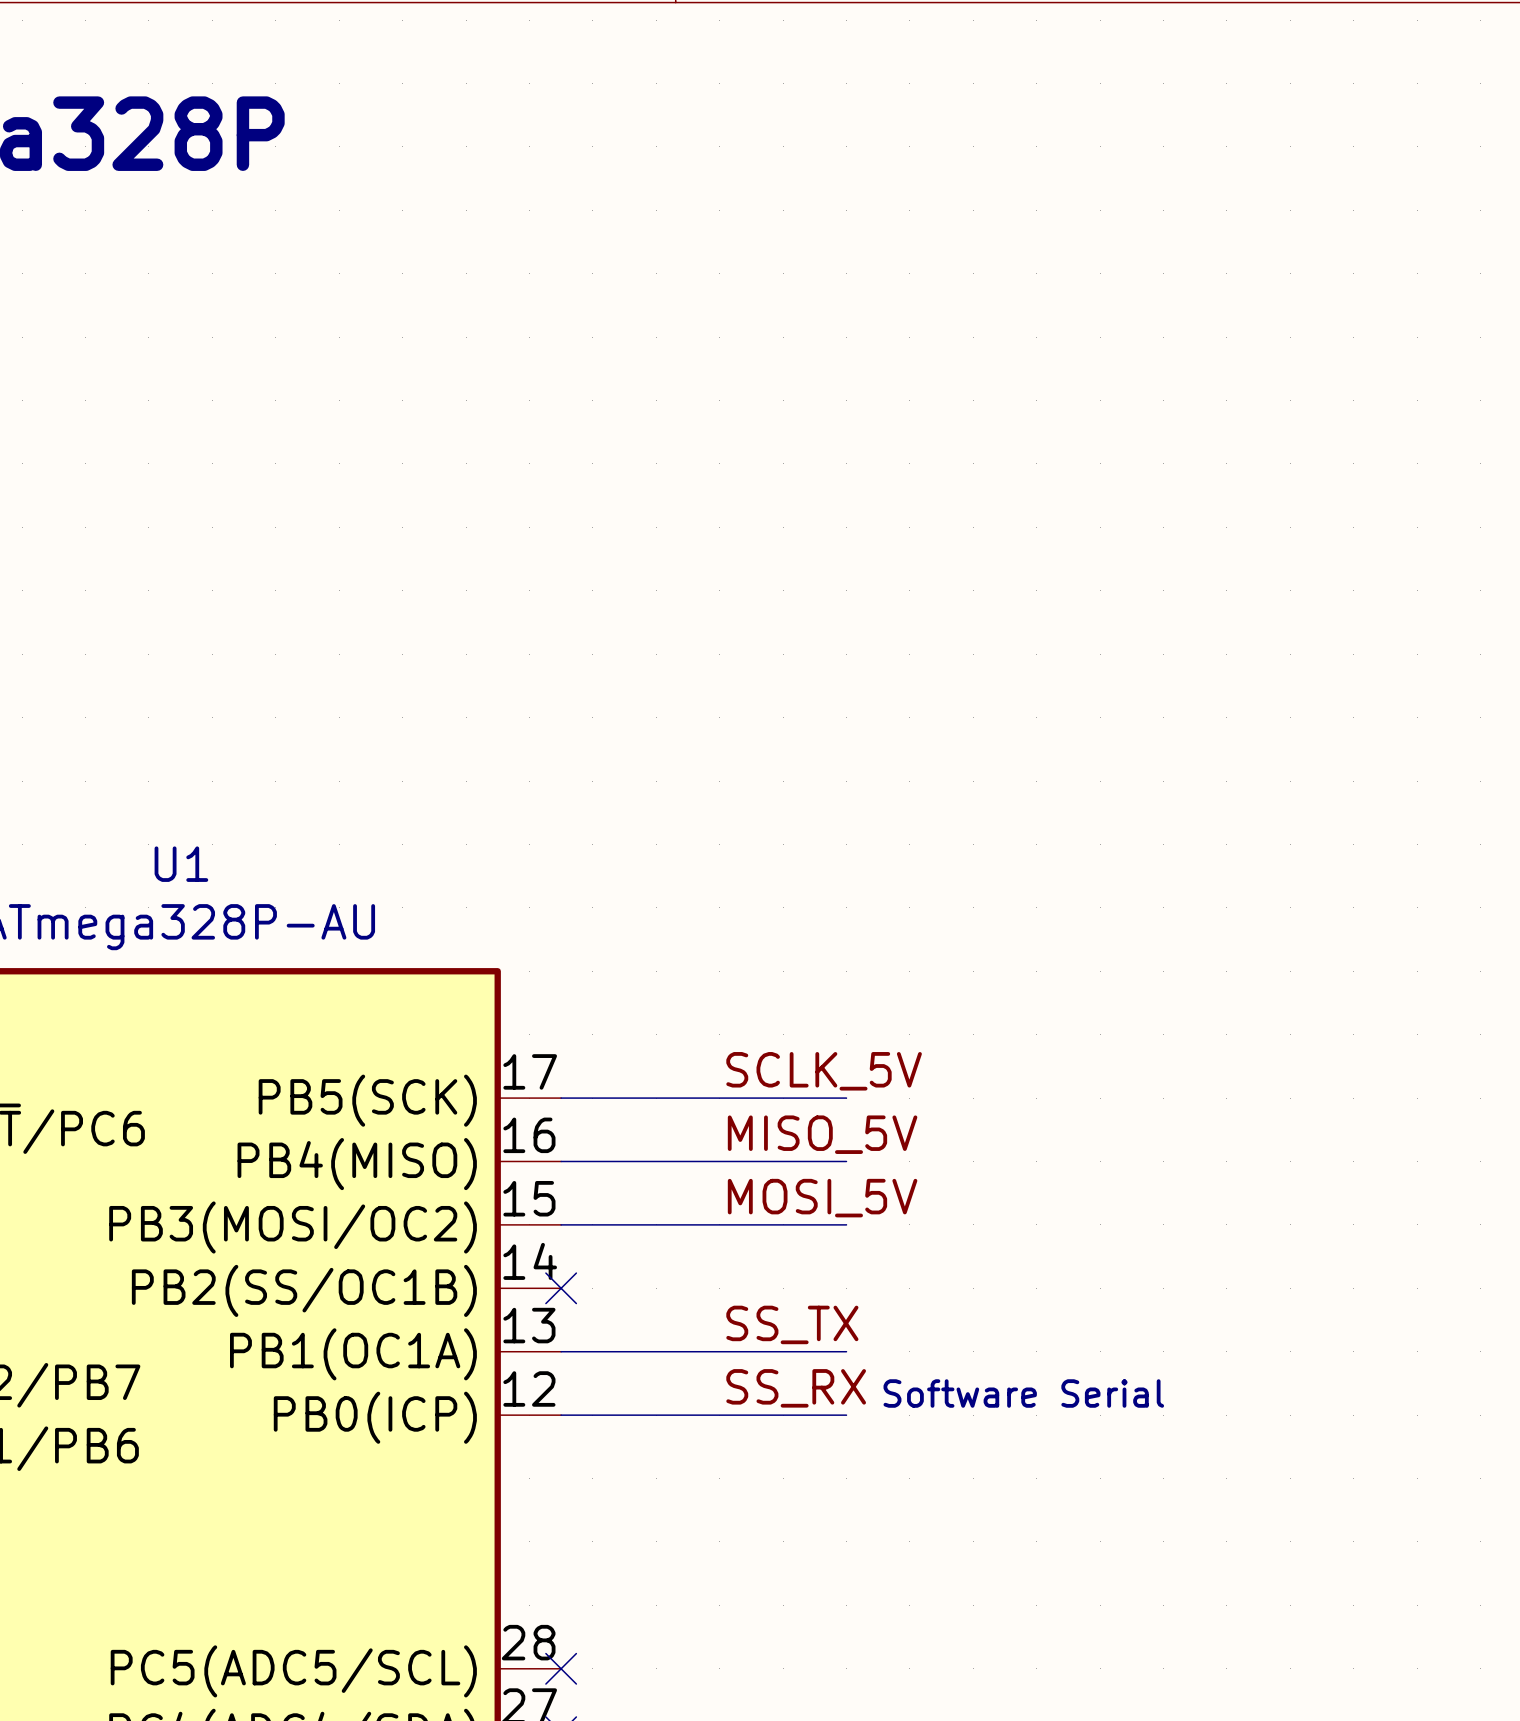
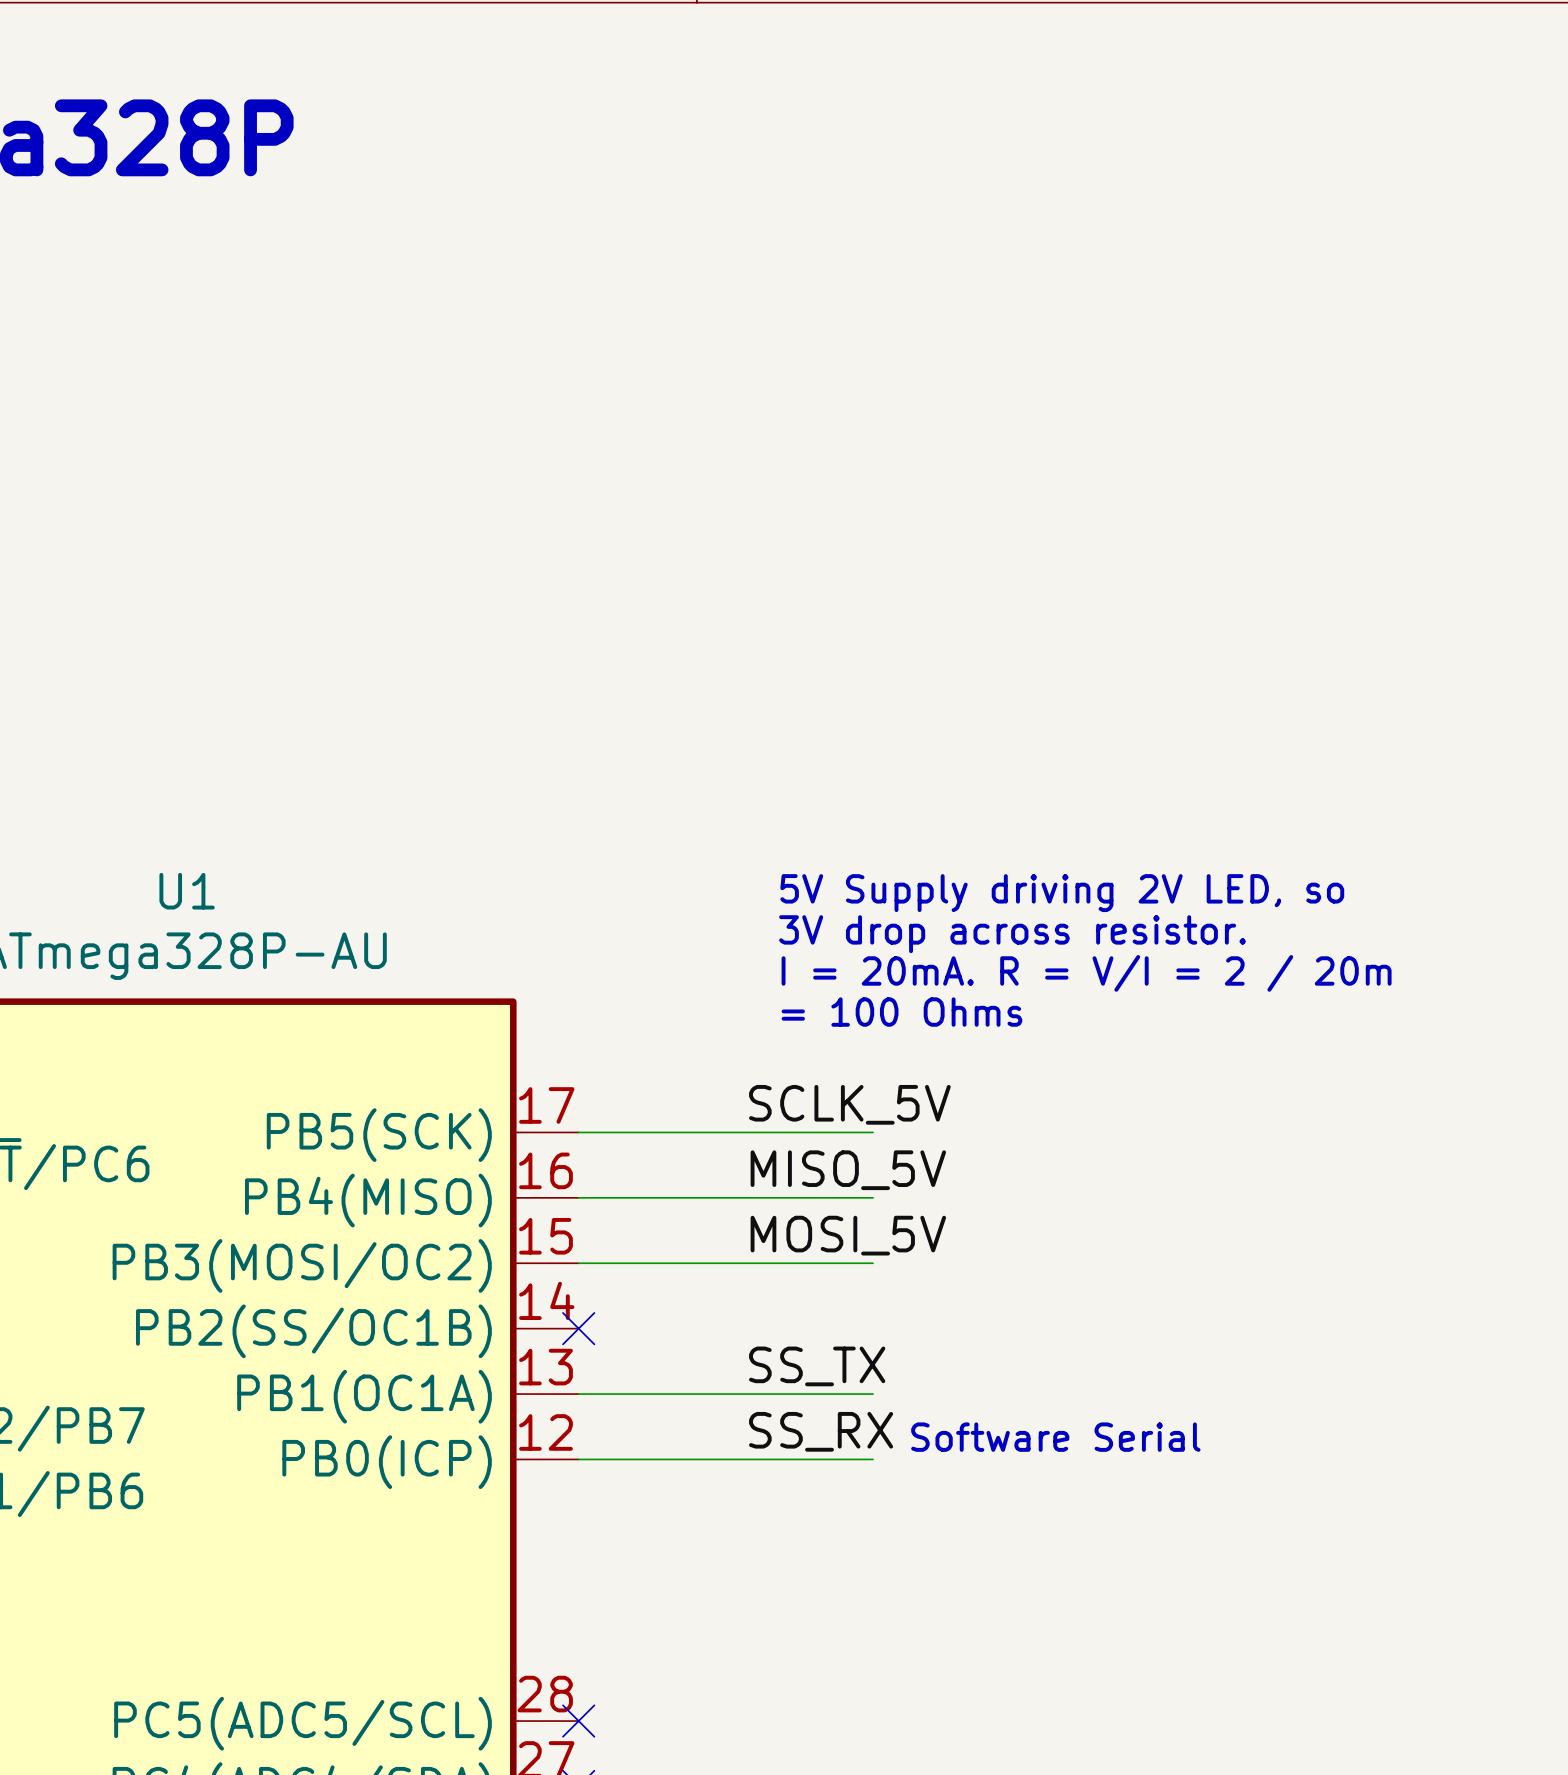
text: none -> 5V Supply driving 2V LED, so (1062, 893)
text: none -> 3V drop across resistor. (1012, 934)
text: none -> I = 20mA. R = V/I = 2 / 20m (1086, 973)
text: none -> = 100 Ohms (901, 1012)

